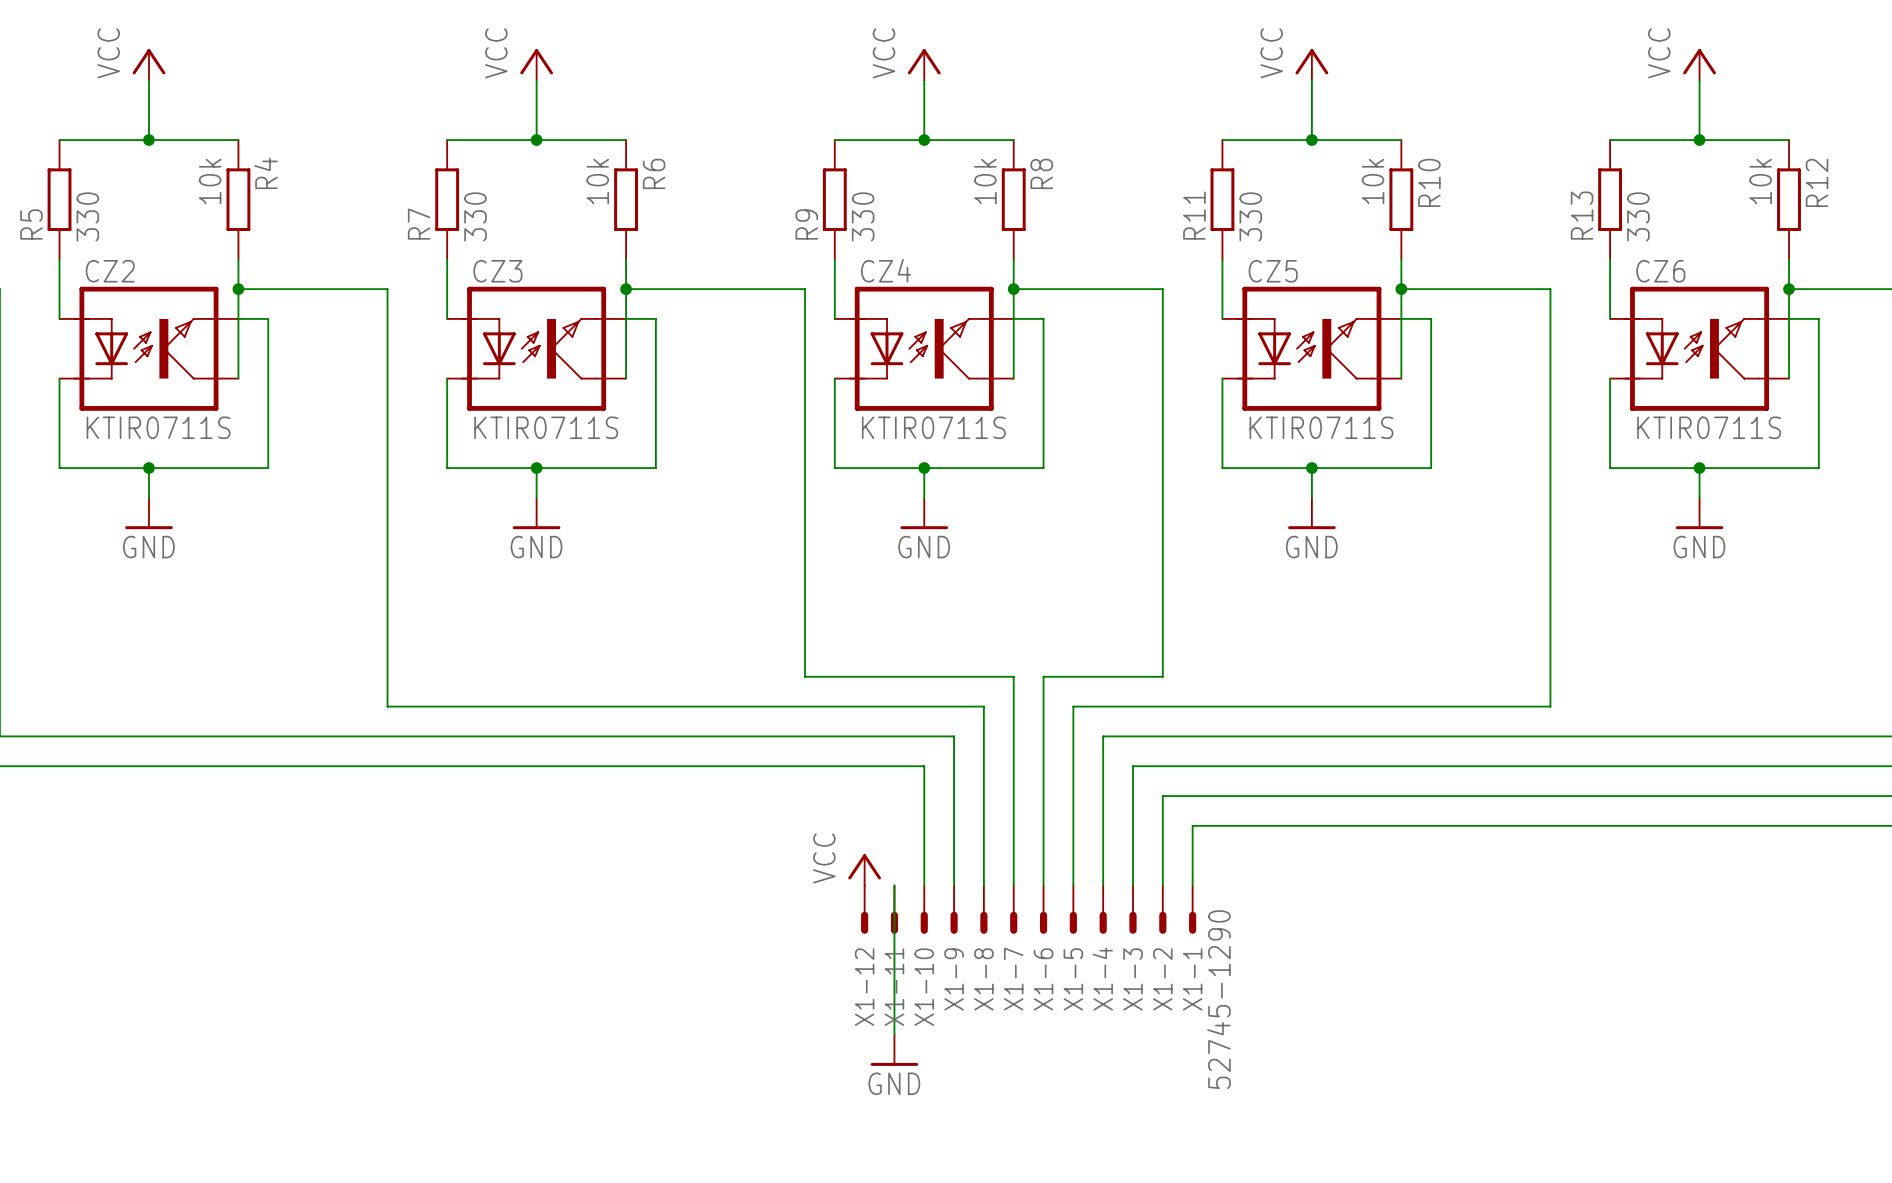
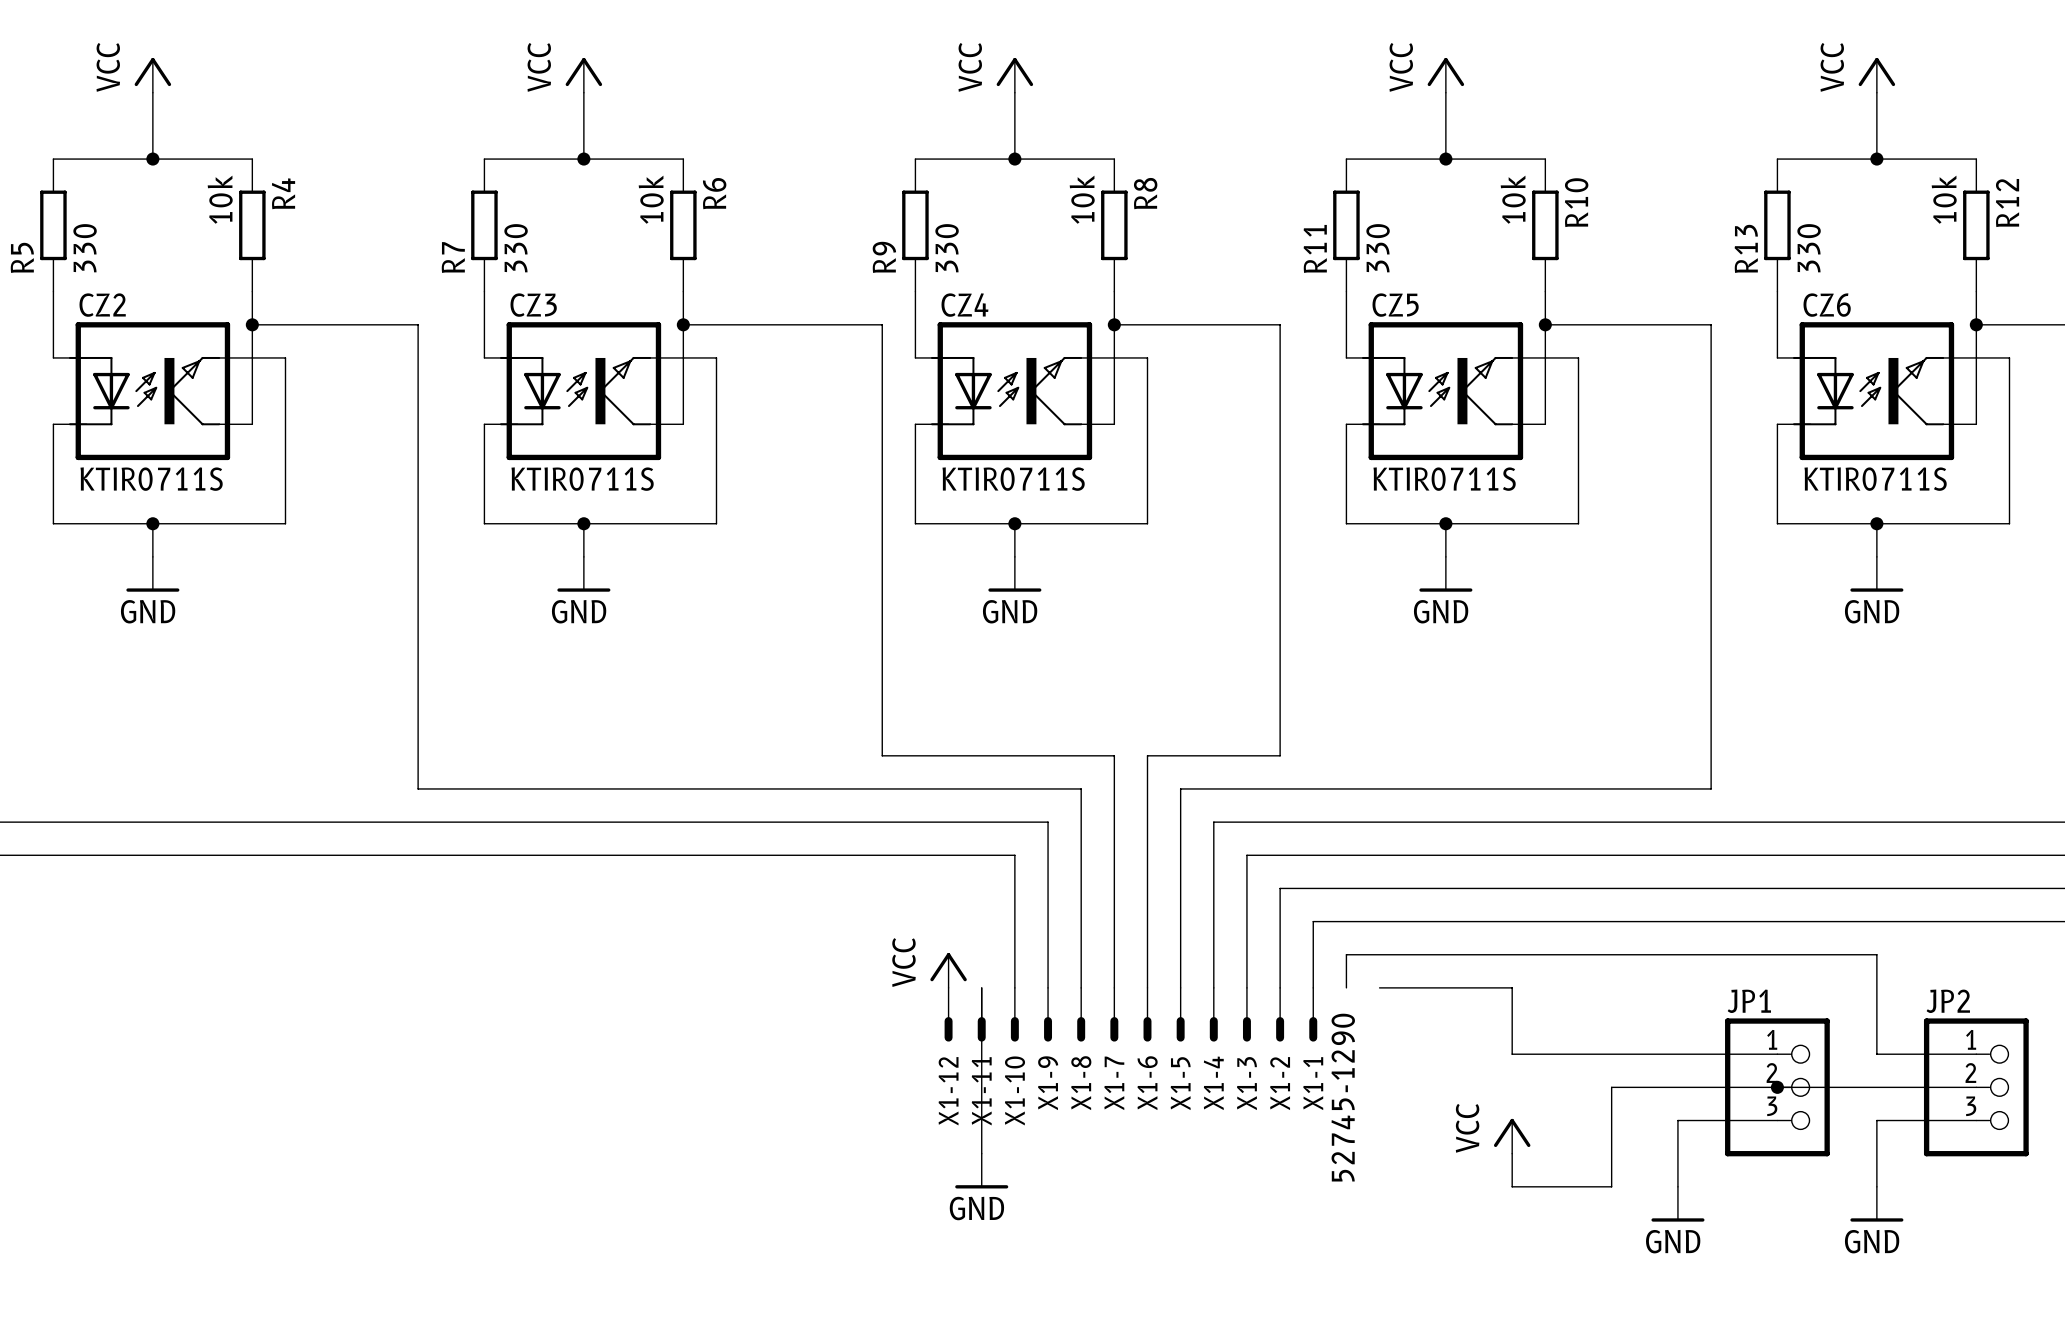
wire: none -> (1346, 987) (1346, 954) (1876, 954) (1876, 1054) (1976, 1054)
wire: none -> (1379, 987) (1512, 987) (1512, 1054) (1777, 1054)
JP1: none -> (1777, 1087)
junction: none -> (1777, 1087)
wire: none -> (1976, 1087) (1611, 1087) (1611, 1186) (1512, 1186) (1512, 1153)
JP2: none -> (1976, 1087)
wire: none -> (1777, 1120) (1677, 1120) (1677, 1186)
wire: none -> (1976, 1120) (1876, 1120) (1876, 1186)
power symbol: none -> VCC (1512, 1136)
power symbol: none -> GND (1677, 1204)
power symbol: none -> GND (1876, 1204)

